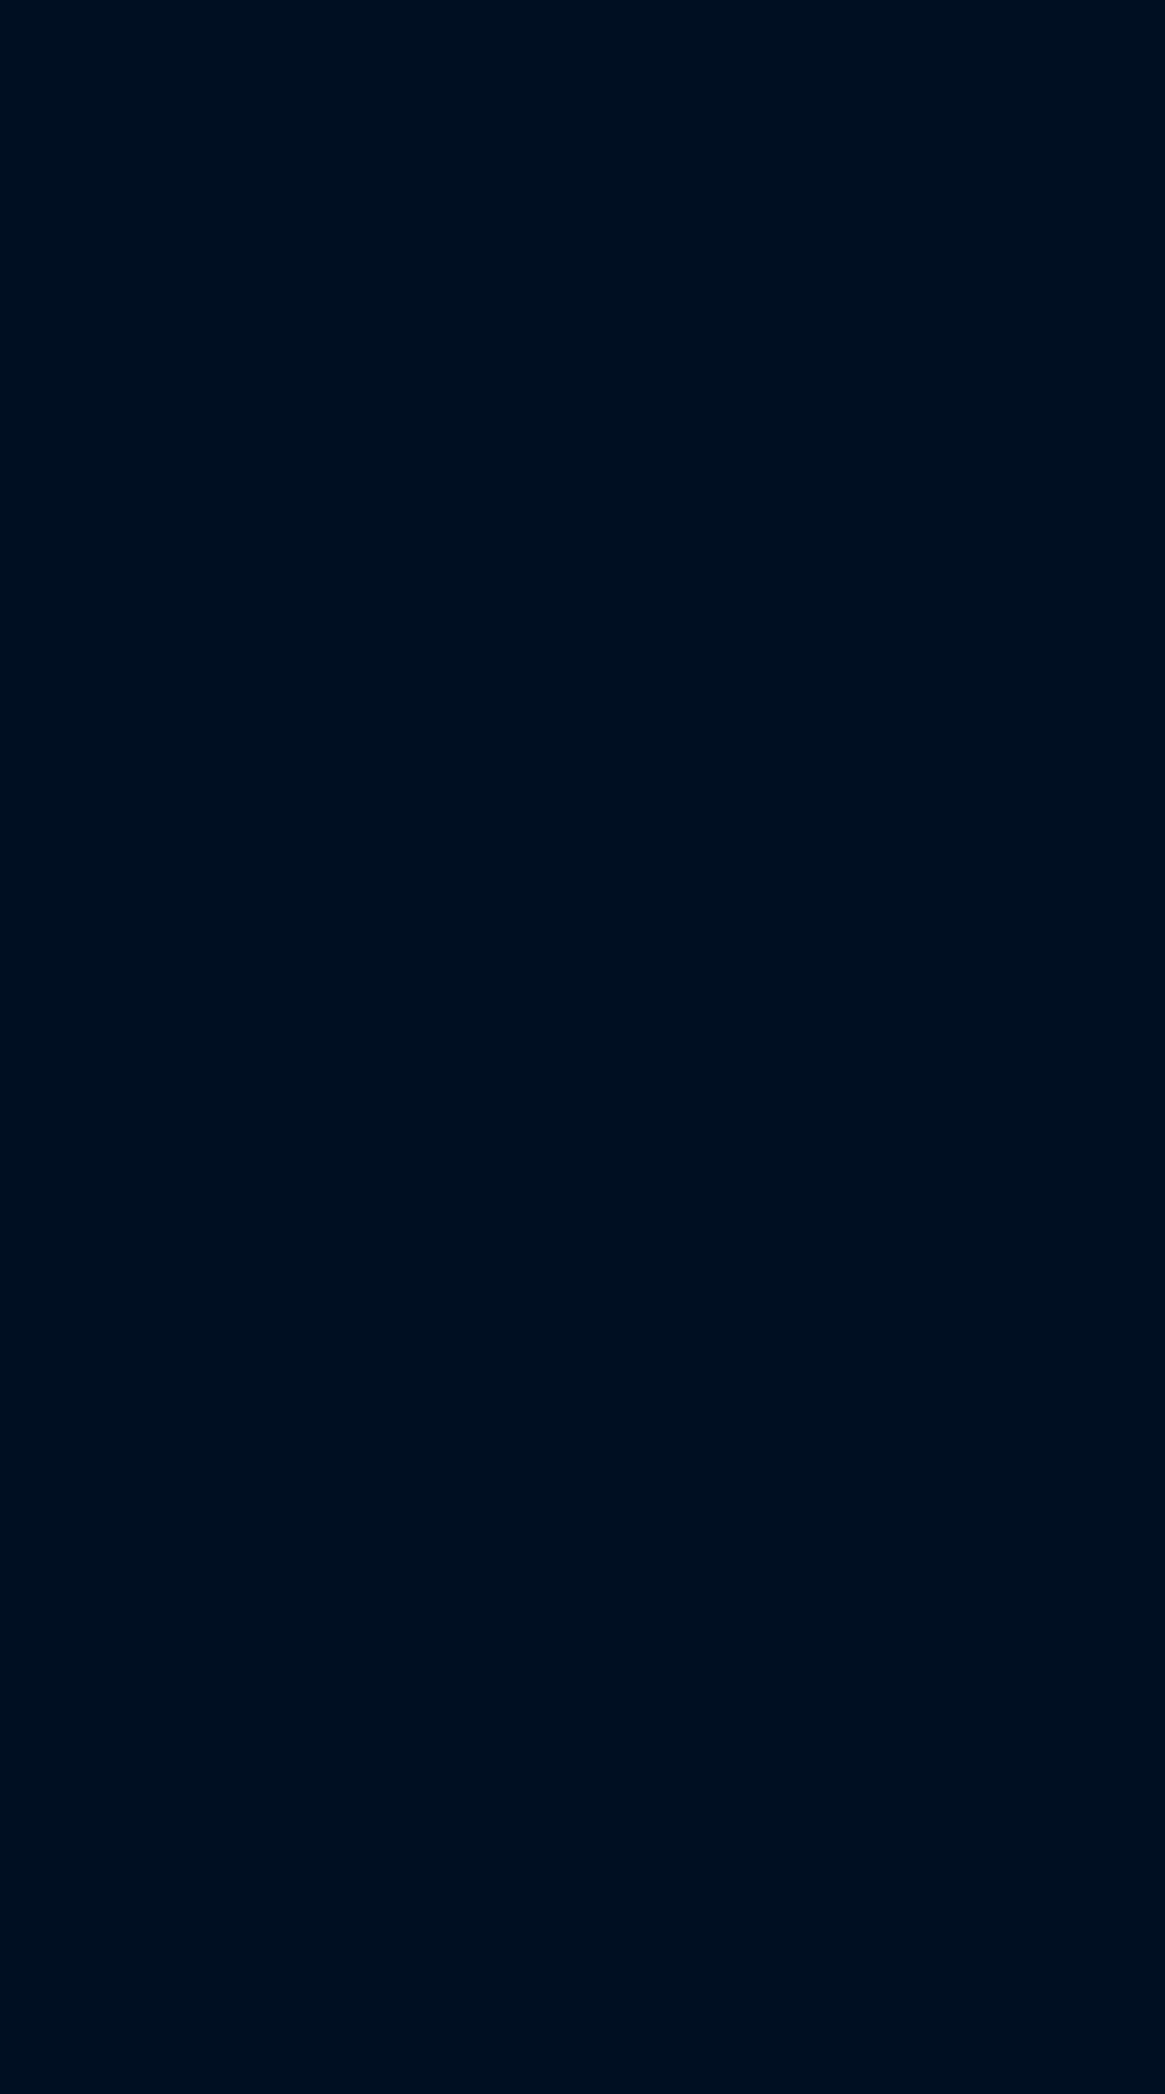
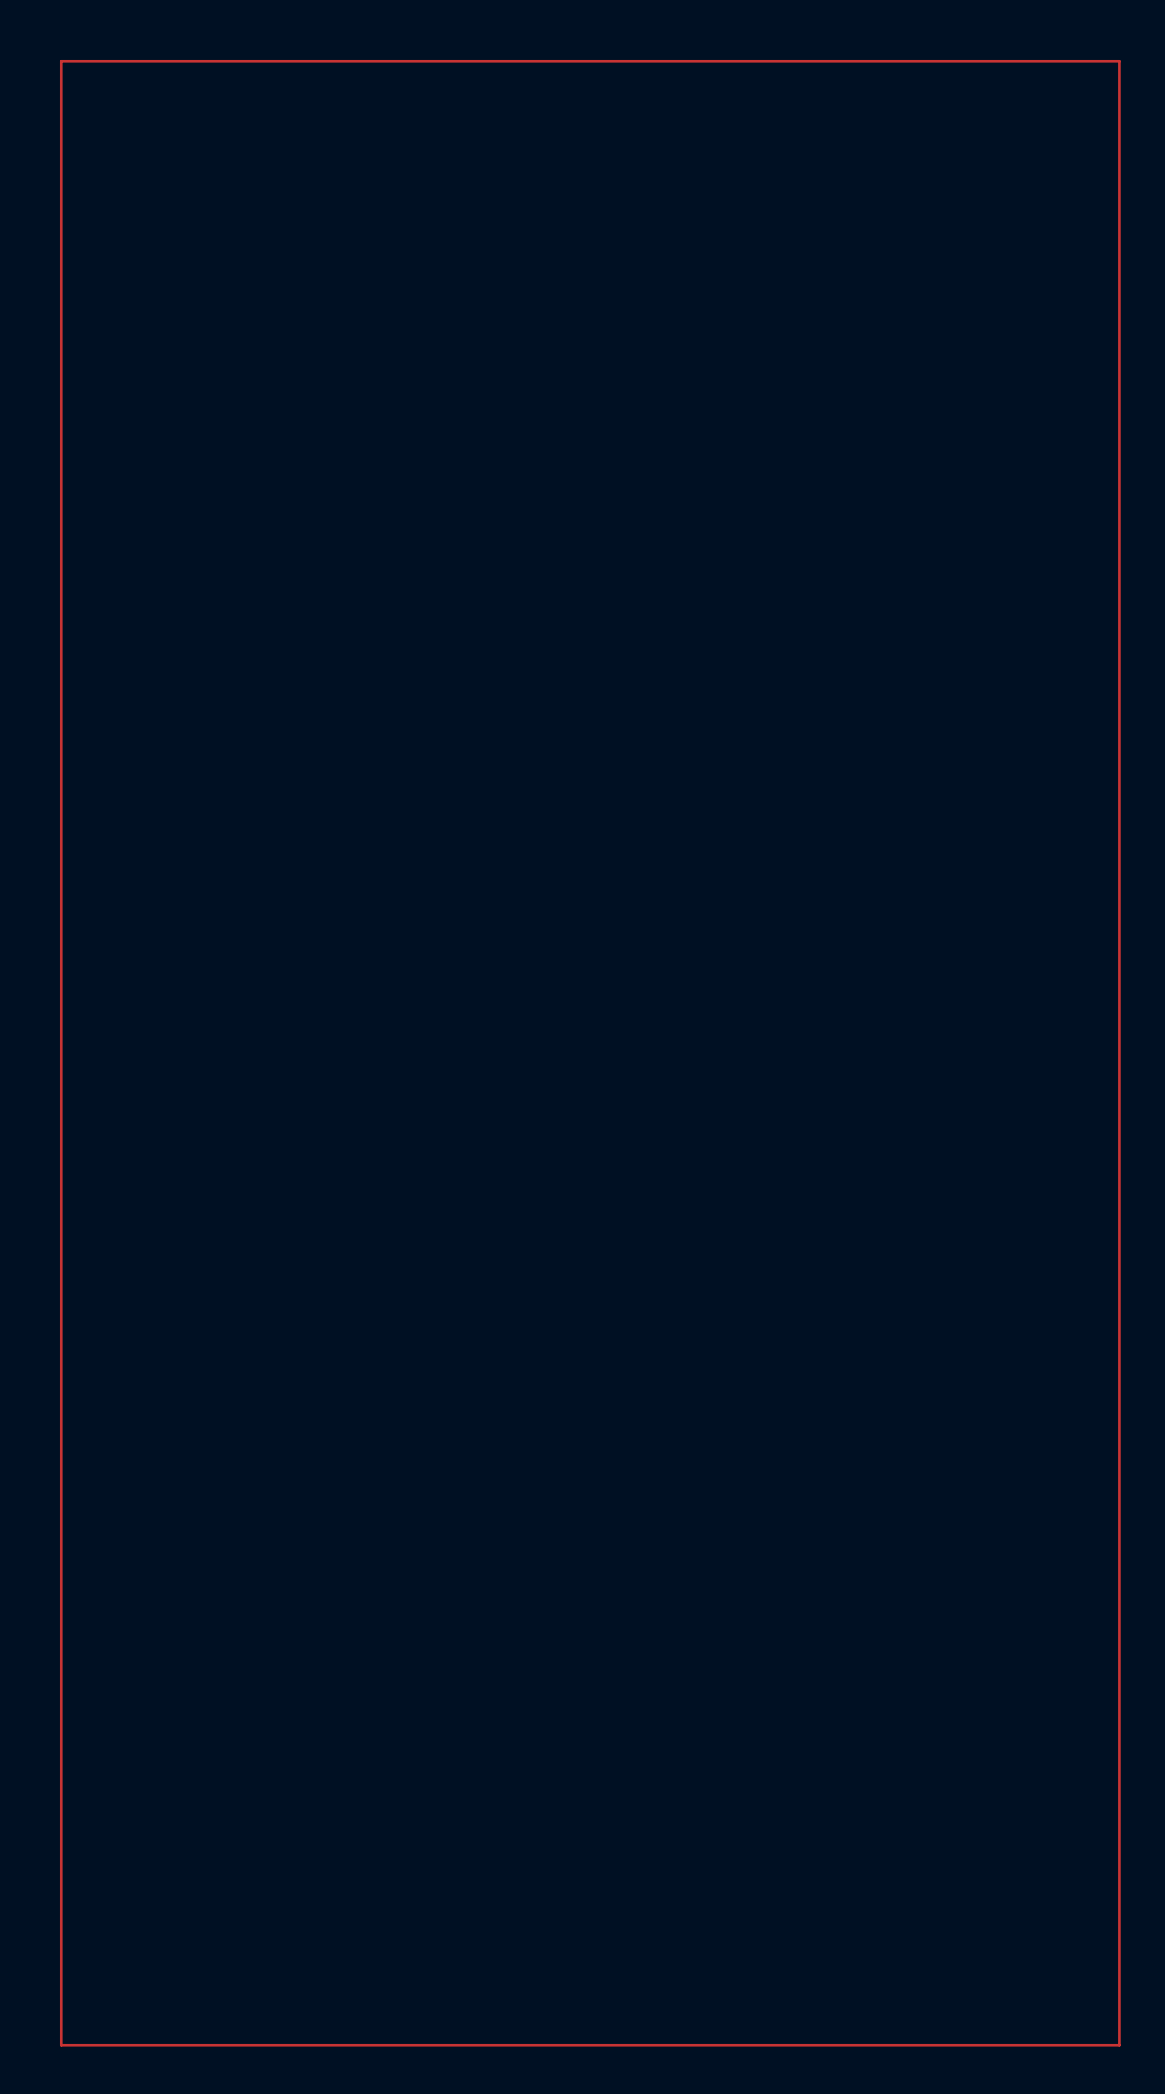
track: none -> (61, 61) (1119, 61) (1119, 2045) (61, 2045) (61, 61)

